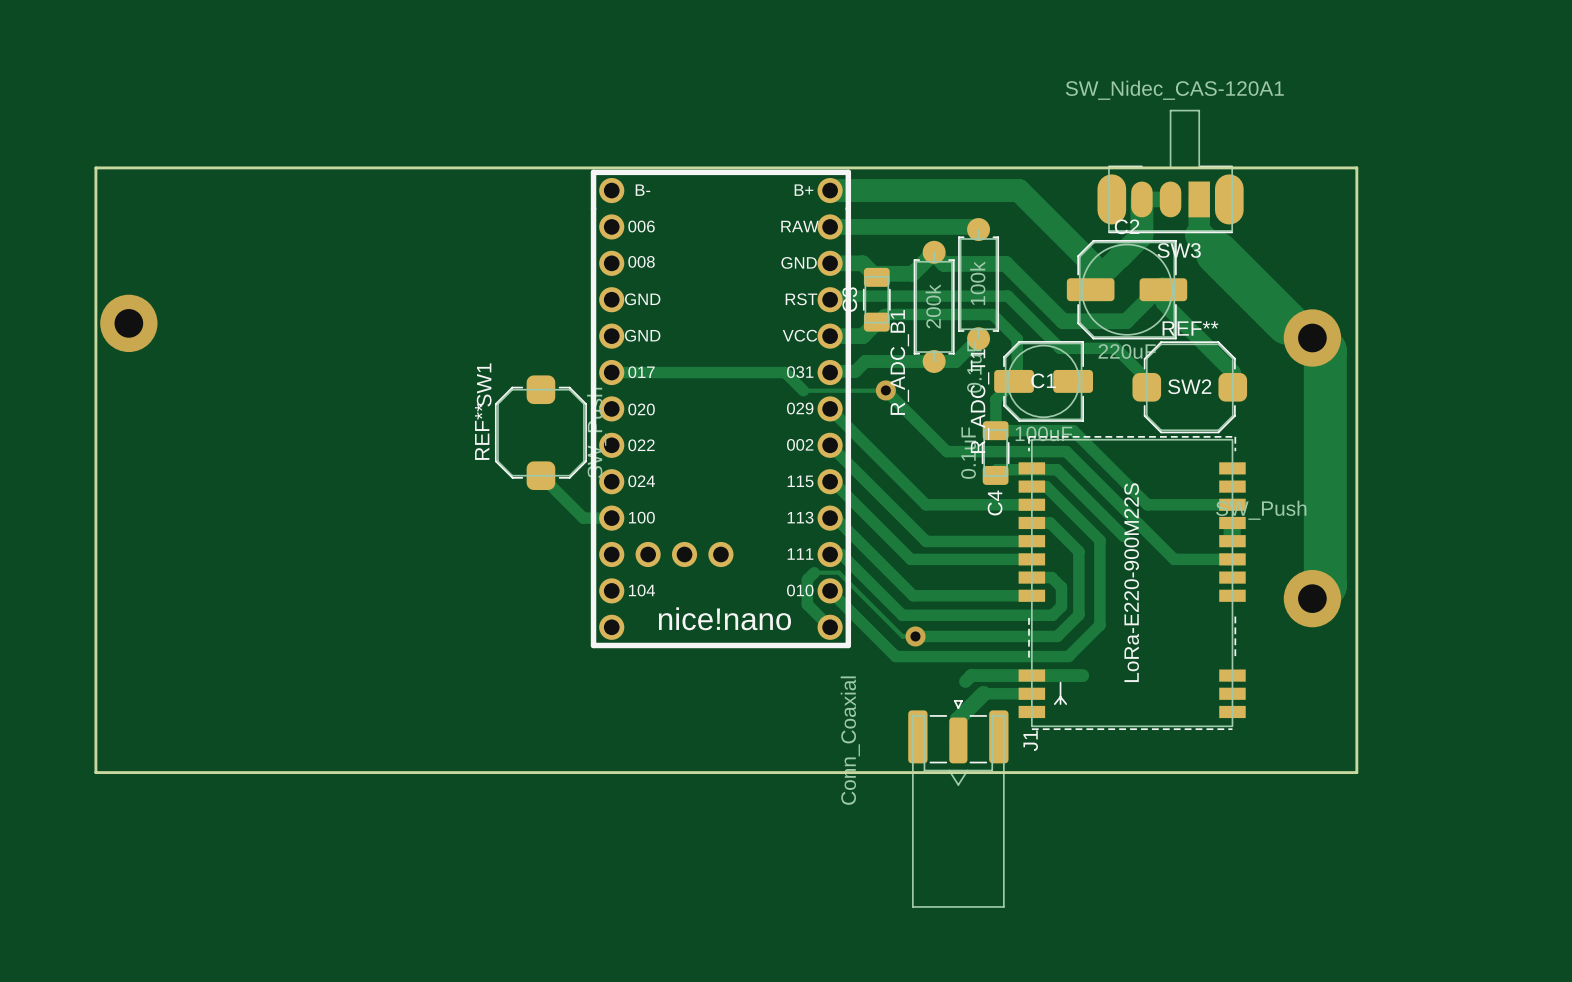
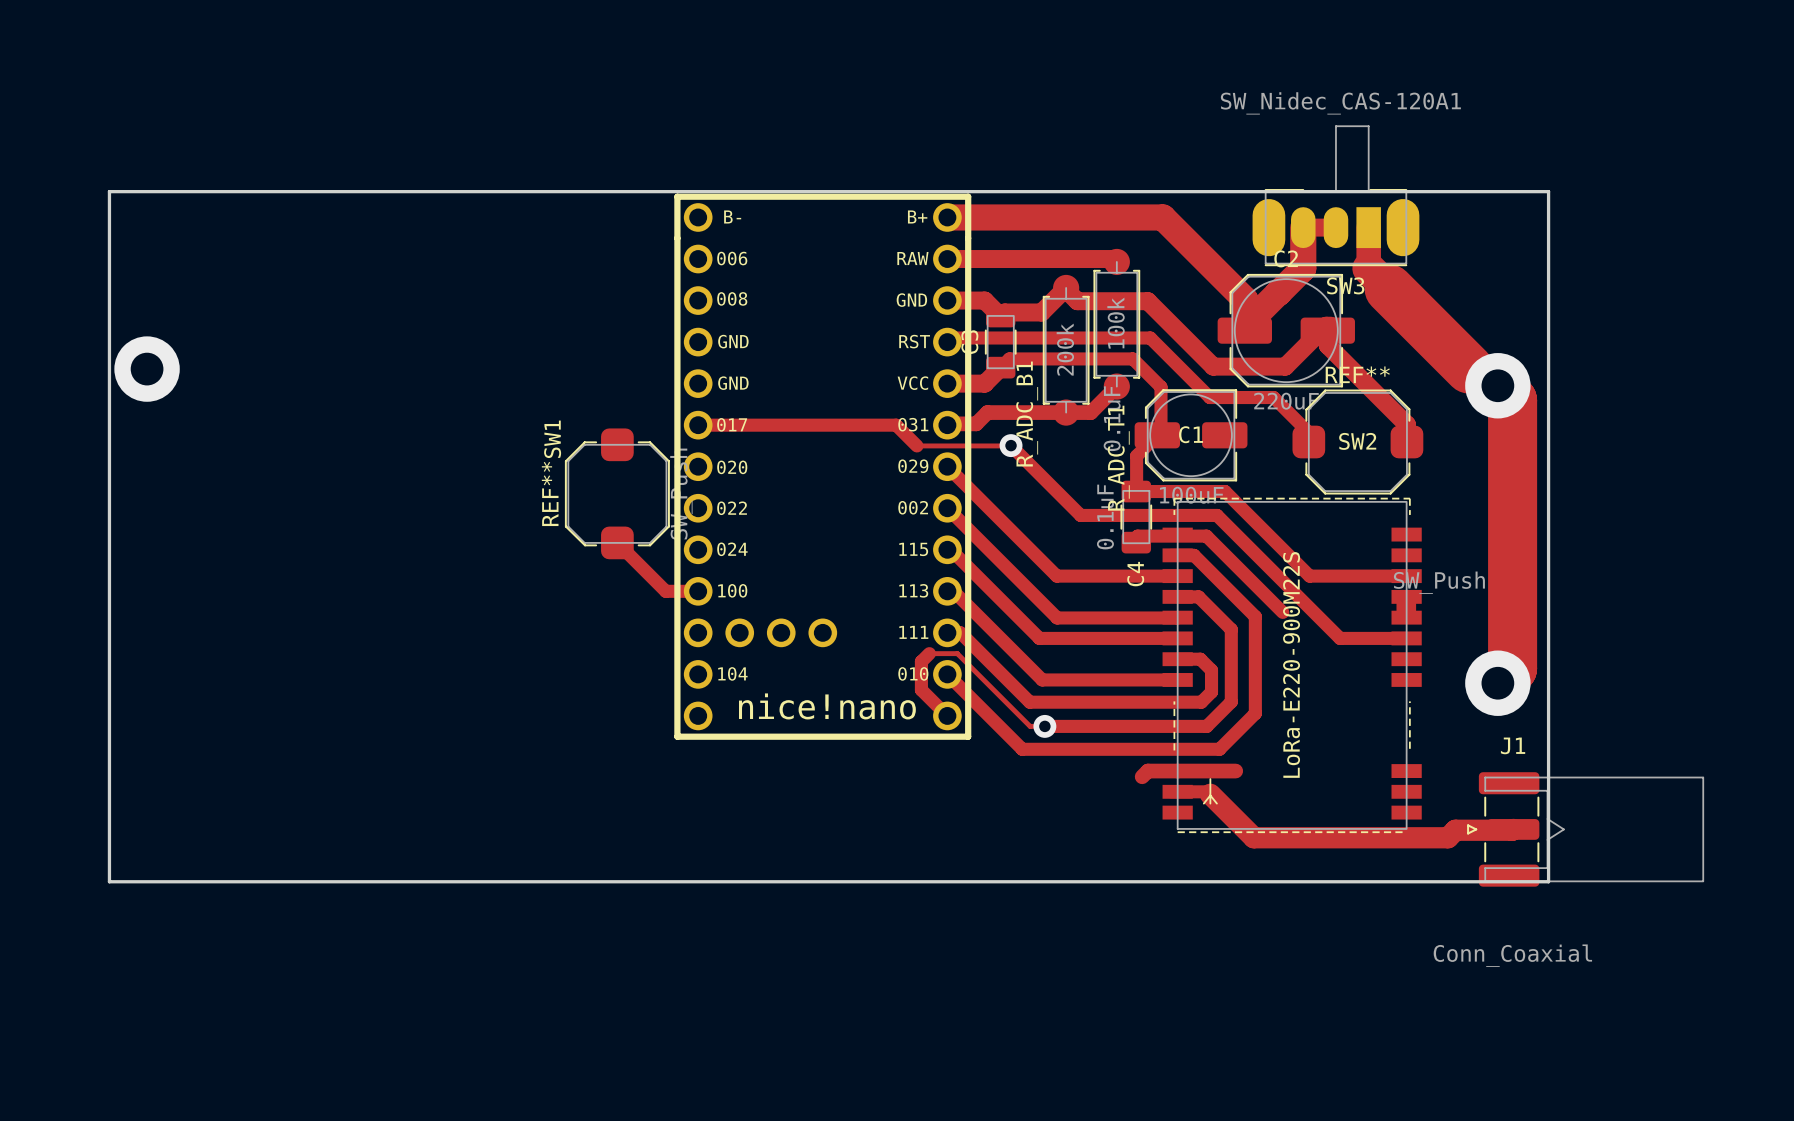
track: (1005, 675) (971, 675) (965, 681) -> (1147, 771) (1142, 776)
track: (1025, 693) (983, 693) (957, 719) (958, 740) -> none
track: none -> (1177, 791) (1207, 791) (1253, 837) (1448, 837) (1455, 830) (1513, 829)
J1 rotation: 0° (958, 803) -> 90° counterclockwise (1585, 829)
J1 position: (958, 803) -> (1585, 829)

